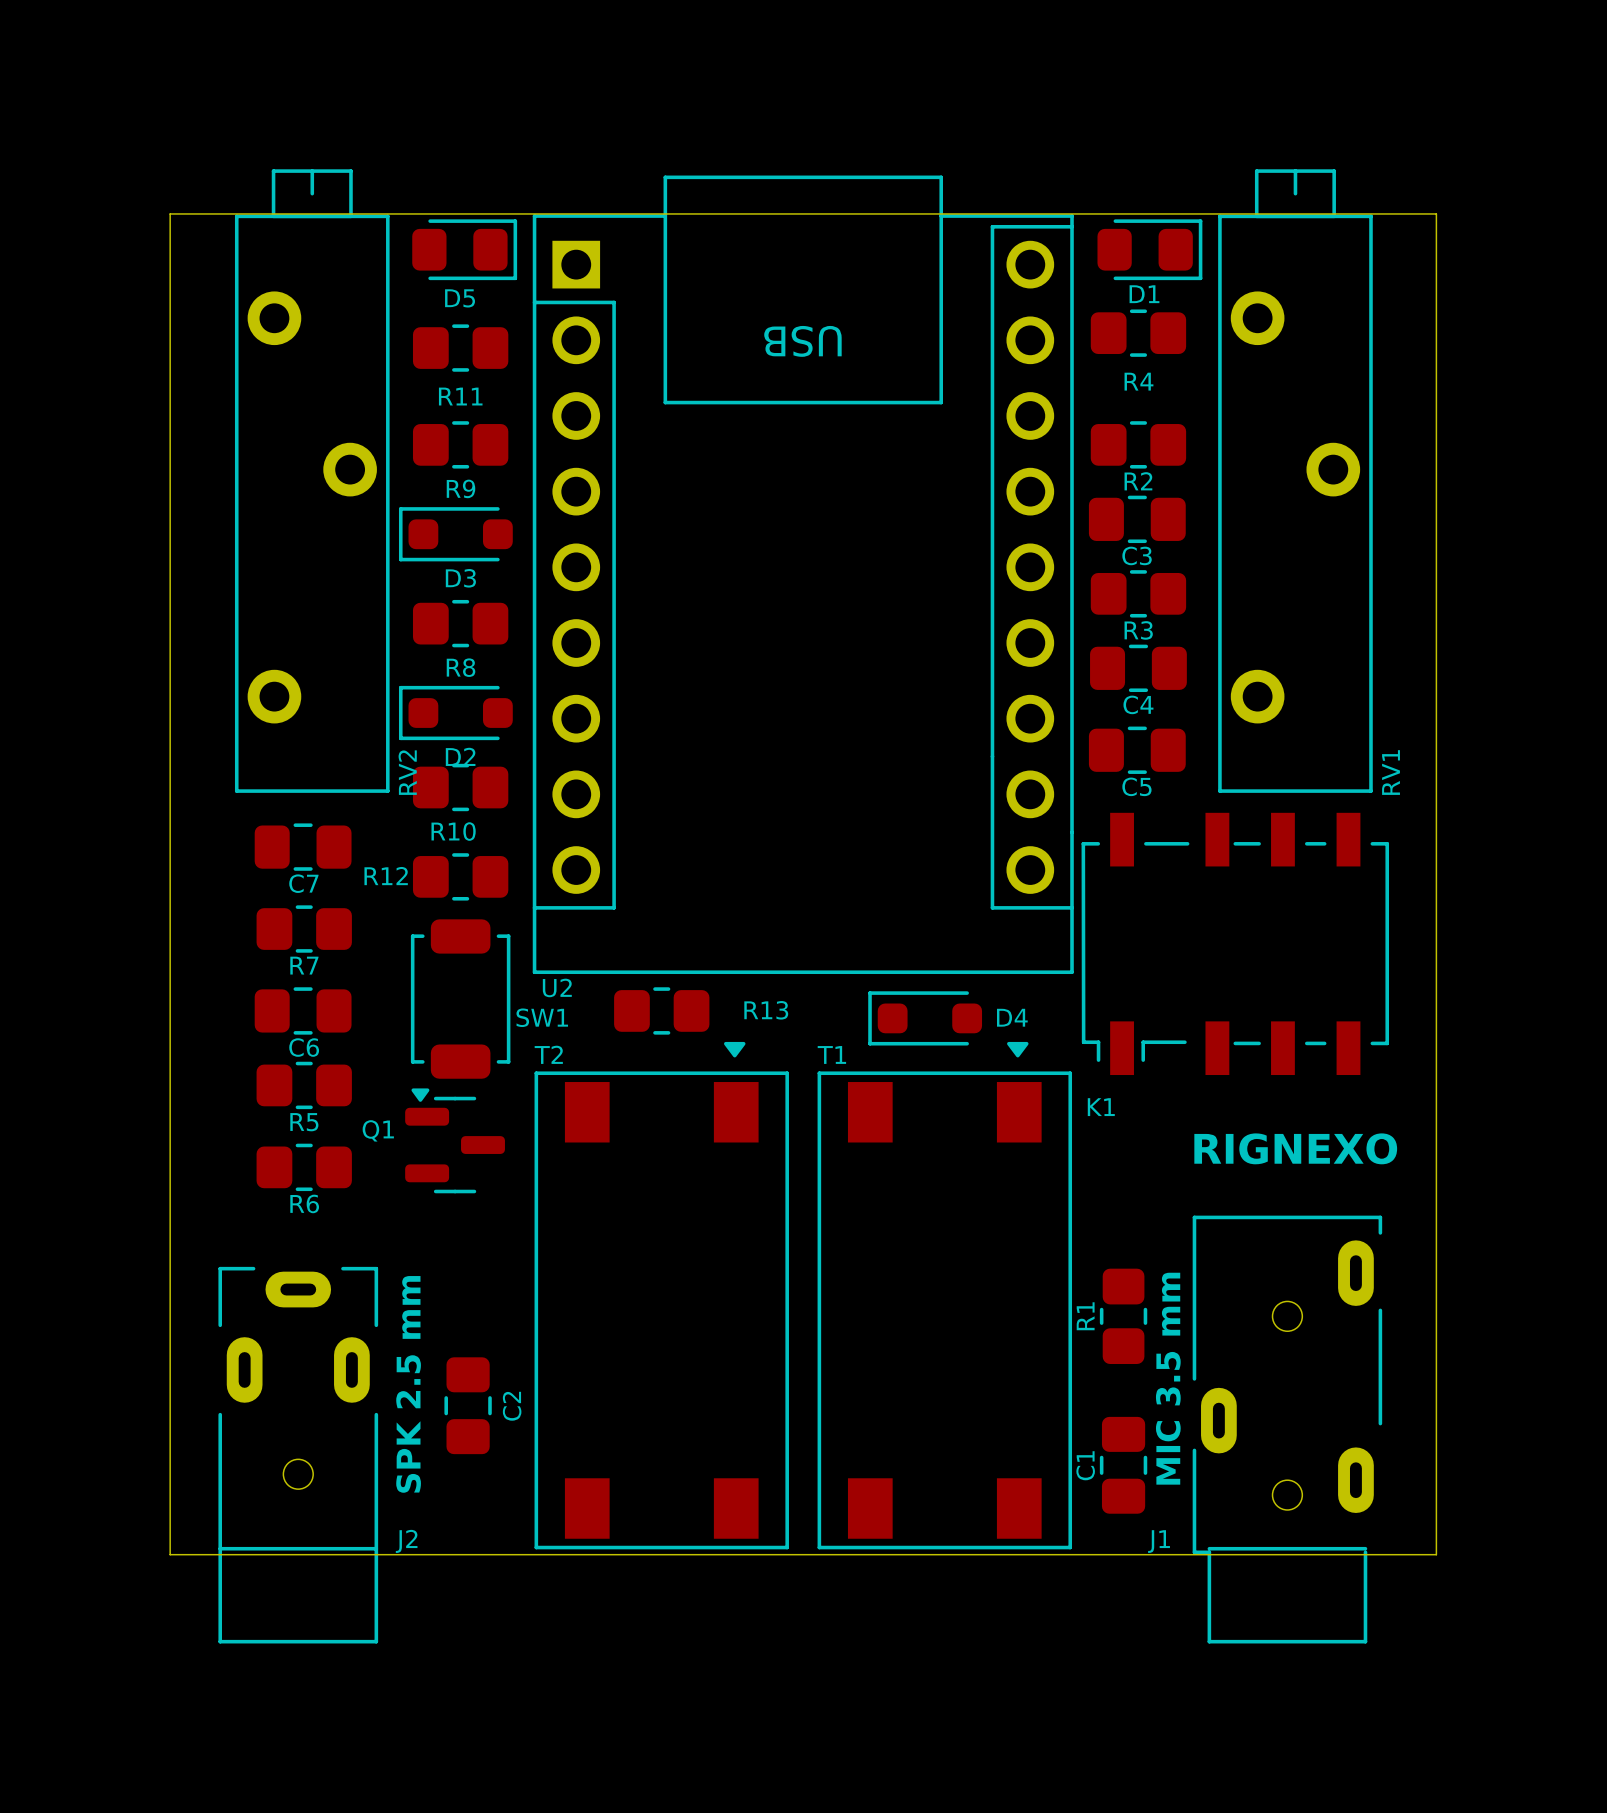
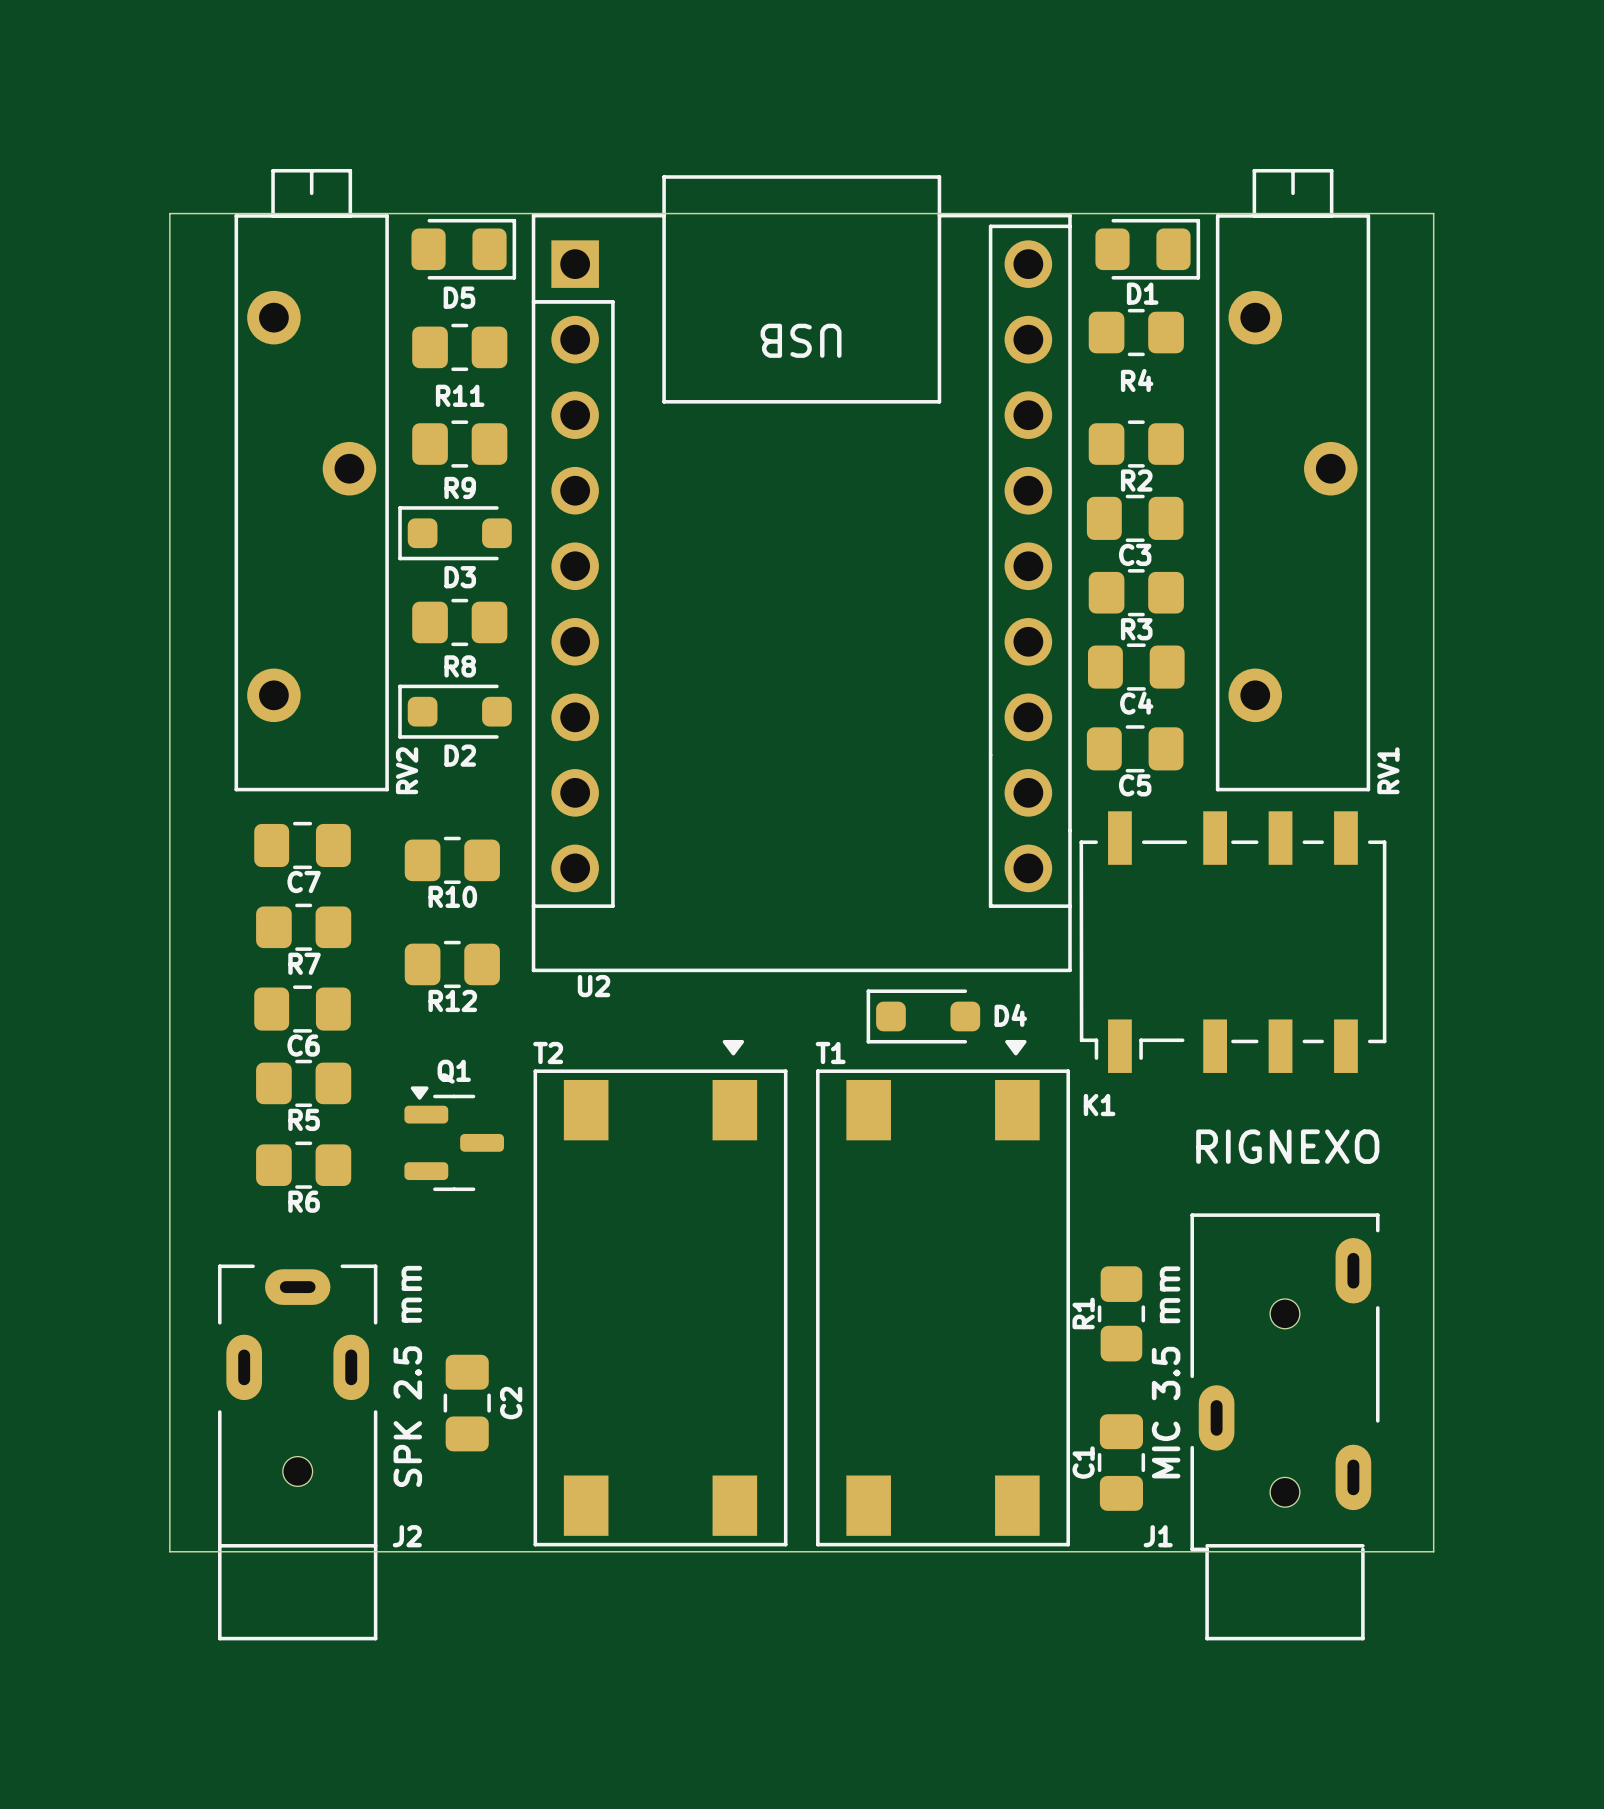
R10 position: (460, 787) -> (452, 860)
R10 name position: R10 (453, 831) -> R10 (452, 896)
R12 name position: R12 (386, 876) -> R12 (452, 1000)
R12 position: (460, 876) -> (452, 964)
U2 name position: U2 (557, 987) -> U2 (594, 986)
SW1: (460, 999) -> none
R13: (661, 1010) -> none
Q1 name position: Q1 (378, 1130) -> Q1 (454, 1071)

